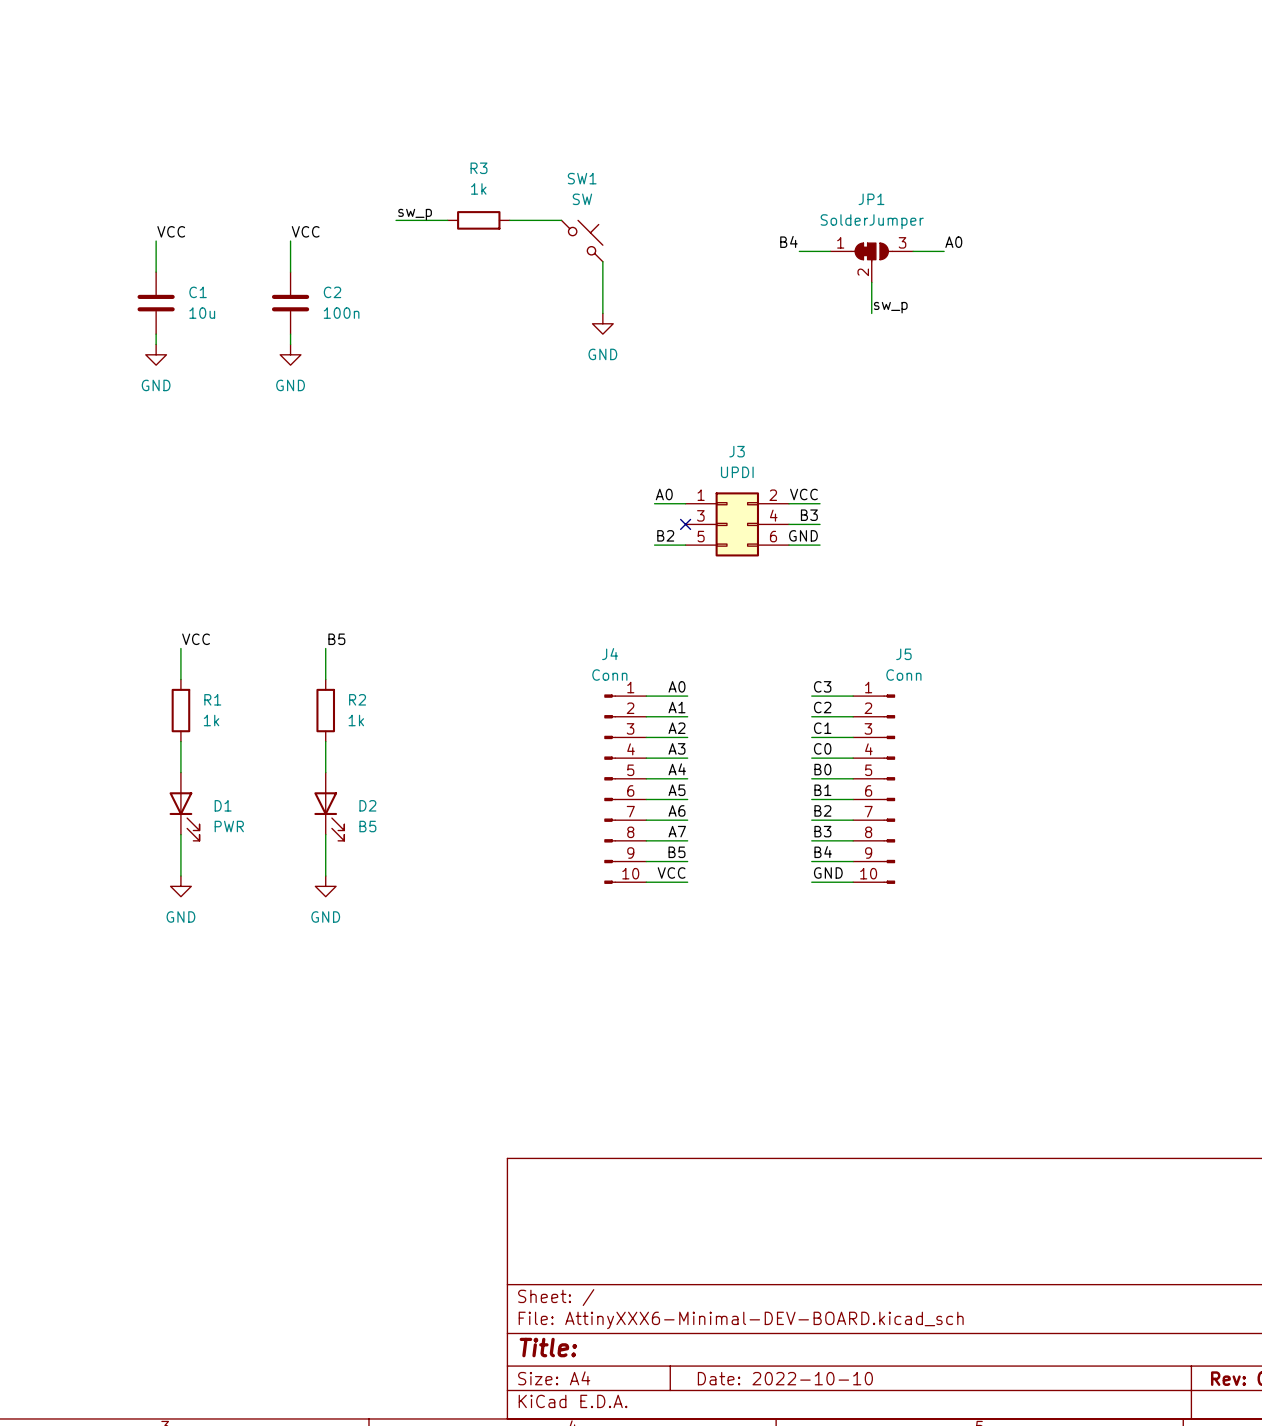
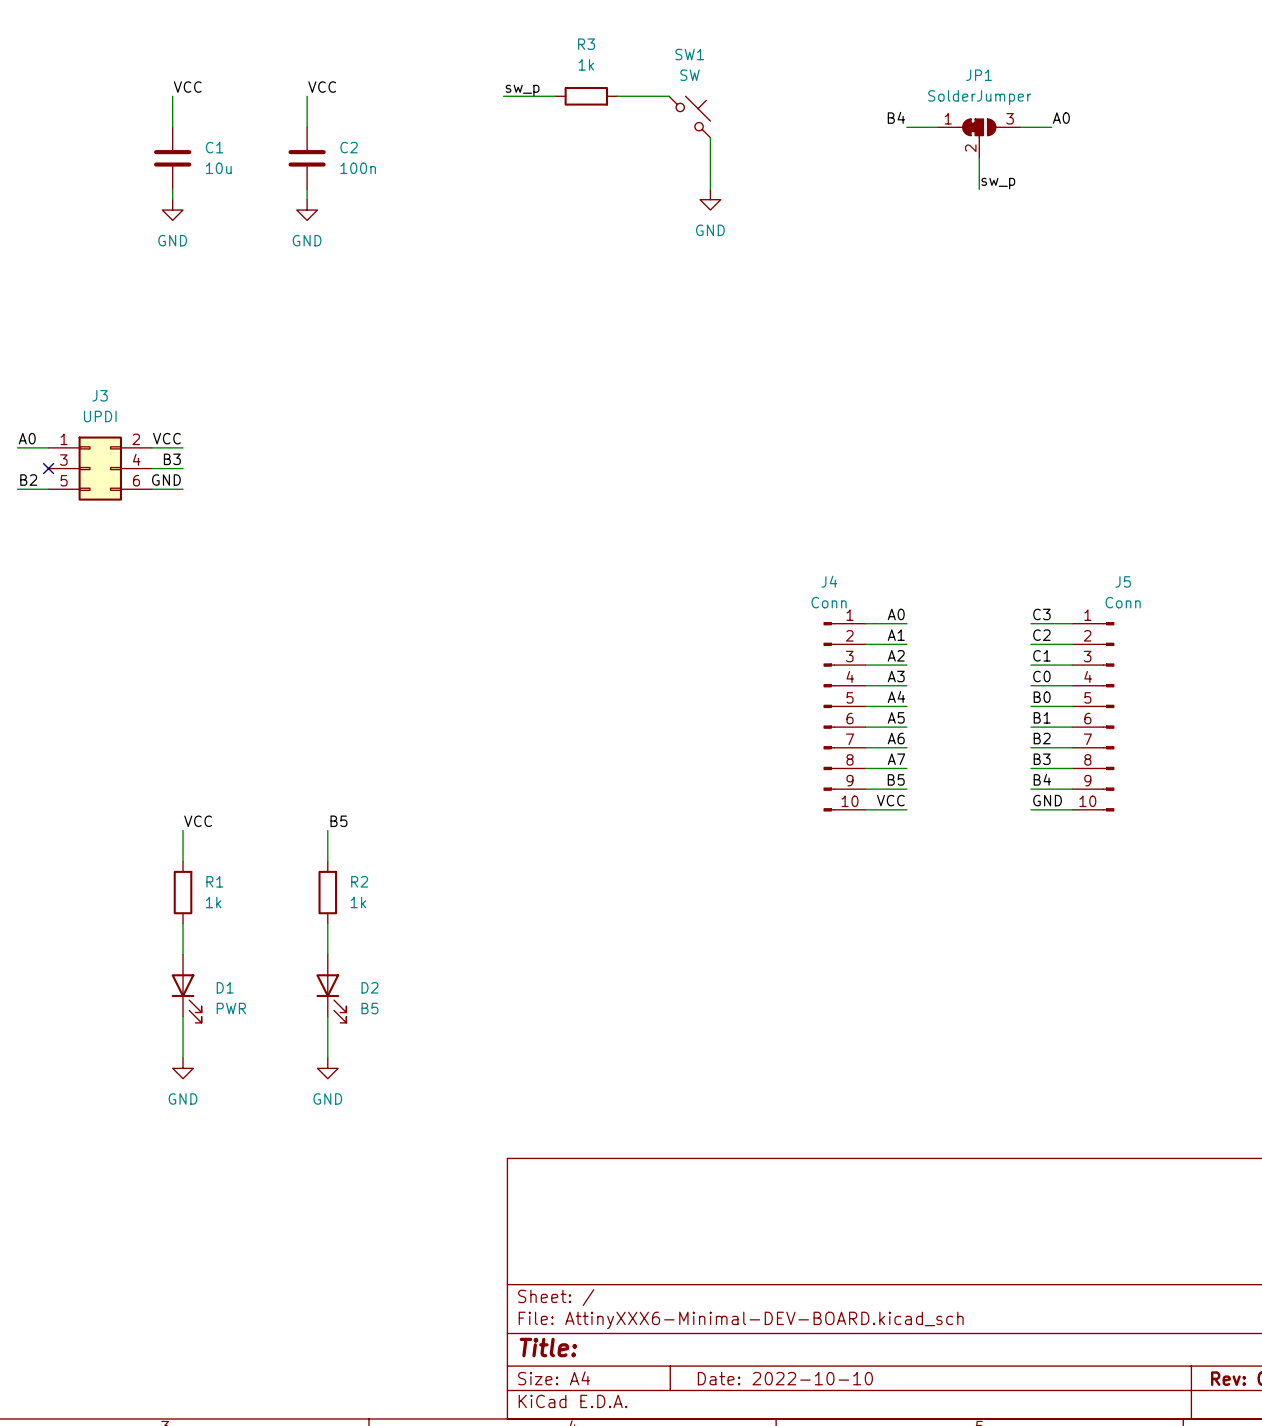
label: none -> VCC (187, 87)
label: none -> VCC (322, 87)
power symbol: none -> GND (710, 199)
power symbol: none -> GND (172, 210)
power symbol: none -> GND (307, 210)
label position: sw_p (415, 214) -> sw_p (522, 90)
wire: (396, 220) (447, 220) -> (503, 96) (555, 96)
R3 position: (478, 220) -> (586, 96)
wire: (509, 220) (561, 220) -> (617, 96) (669, 96)
label: VCC (171, 231) -> none
label: VCC (305, 231) -> none
wire: (156, 241) (156, 272) -> (172, 96) (172, 127)
wire: (290, 241) (290, 272) -> (307, 96) (307, 127)
SW1 position: (582, 241) -> (689, 116)
label position: B4 (788, 241) -> B4 (896, 117)
label position: A0 (953, 242) -> A0 (1061, 118)
wire: (799, 251) (830, 251) -> (906, 127) (937, 127)
wire: (913, 251) (944, 251) -> (1020, 127) (1051, 127)
wire: (602, 261) (602, 313) -> (710, 137) (710, 189)
JP1 position: (871, 262) -> (979, 138)
wire: (871, 282) (871, 313) -> (979, 158) (979, 189)
C1 position: (156, 303) -> (172, 158)
C2 position: (290, 303) -> (307, 158)
label position: sw_p (890, 307) -> sw_p (998, 183)
power symbol: GND (602, 323) -> none
wire: (156, 334) (156, 344) -> (172, 189) (172, 199)
wire: (290, 334) (290, 344) -> (307, 189) (307, 199)
power symbol: GND (156, 354) -> none
power symbol: GND (290, 354) -> none
label: none -> A0 (27, 438)
label: none -> VCC (166, 438)
wire: none -> (17, 447) (48, 447)
wire: none -> (151, 447) (183, 447)
label: none -> B3 (172, 459)
no-connect mark: none -> (48, 468)
wire: none -> (151, 468) (183, 468)
label: none -> B2 (28, 480)
label: none -> GND (166, 480)
wire: none -> (17, 489) (48, 489)
wire: none -> (151, 489) (183, 489)
label: A0 (664, 494) -> none
label: VCC (803, 494) -> none
wire: (654, 503) (685, 503) -> none
wire: (789, 503) (820, 503) -> none
label: B3 (809, 515) -> none
no-connect mark: (685, 524) -> none
J3 position: (737, 524) -> (100, 468)
wire: (789, 524) (820, 524) -> none
label: B2 (665, 535) -> none
label: GND (803, 535) -> none
wire: (654, 545) (685, 545) -> none
wire: (789, 545) (820, 545) -> none
label: none -> A0 (896, 614)
label: none -> C3 (1041, 614)
wire: none -> (1030, 623) (1072, 623)
label: none -> A1 (896, 635)
label: none -> C2 (1041, 635)
label: VCC (196, 639) -> none
label: B5 (336, 639) -> none
wire: none -> (1030, 644) (1072, 644)
wire: (180, 648) (180, 679) -> (183, 830) (183, 861)
wire: (325, 648) (325, 679) -> (327, 830) (327, 861)
label: none -> A2 (896, 655)
label: none -> C1 (1041, 655)
wire: none -> (1030, 665) (1072, 665)
label: none -> A3 (896, 676)
label: none -> C0 (1041, 676)
wire: none -> (1030, 685) (1072, 685)
label: A0 (676, 686) -> none
label: C3 (822, 686) -> none
wire: (646, 696) (687, 696) -> none
wire: (811, 696) (853, 696) -> (865, 623) (906, 623)
label: none -> A4 (896, 696)
label: none -> B0 (1042, 697)
wire: none -> (1030, 706) (1072, 706)
label: A1 (676, 707) -> none
label: C2 (822, 707) -> none
R1 position: (180, 710) -> (183, 892)
R2 position: (325, 710) -> (327, 892)
wire: (646, 716) (687, 716) -> none
wire: (811, 716) (853, 716) -> (865, 644) (906, 644)
label: none -> A5 (896, 717)
label: none -> B1 (1042, 717)
wire: none -> (1030, 727) (1072, 727)
label: A2 (676, 728) -> none
label: C1 (822, 728) -> none
wire: (646, 737) (687, 737) -> none
wire: (811, 737) (853, 737) -> (865, 665) (906, 665)
label: none -> A6 (896, 738)
label: none -> B2 (1042, 738)
wire: (180, 741) (180, 772) -> (183, 923) (183, 954)
wire: (325, 741) (325, 772) -> (327, 923) (327, 954)
wire: none -> (1030, 747) (1072, 747)
label: A3 (676, 748) -> none
label: C0 (822, 748) -> none
wire: (646, 758) (687, 758) -> none
wire: (811, 758) (853, 758) -> (865, 685) (906, 685)
label: none -> A7 (896, 759)
label: none -> B3 (1042, 759)
wire: none -> (1030, 768) (1072, 768)
label: A4 (677, 769) -> none
label: B0 (822, 769) -> none
wire: (646, 778) (687, 778) -> none
wire: (811, 778) (853, 778) -> (865, 706) (906, 706)
label: none -> B5 (896, 779)
label: none -> B4 (1042, 779)
J4 position: (625, 789) -> (844, 716)
J5 position: (874, 789) -> (1093, 716)
wire: none -> (1030, 789) (1072, 789)
label: A5 (676, 790) -> none
label: B1 (822, 790) -> none
wire: (646, 799) (687, 799) -> none
wire: (811, 799) (853, 799) -> (865, 727) (906, 727)
label: none -> VCC (890, 800)
label: none -> GND (1047, 800)
D1 position: (184, 806) -> (186, 988)
D2 position: (329, 806) -> (331, 988)
wire: none -> (1030, 809) (1072, 809)
label: A6 (676, 810) -> none
label: B2 (822, 810) -> none
wire: (646, 820) (687, 820) -> none
wire: (811, 820) (853, 820) -> (865, 747) (906, 747)
label: none -> VCC (198, 821)
label: none -> B5 (338, 821)
label: A7 (677, 831) -> none
label: B3 (822, 831) -> none
wire: (180, 834) (180, 876) -> (183, 1016) (183, 1058)
wire: (325, 834) (325, 876) -> (327, 1016) (327, 1058)
wire: (646, 840) (687, 840) -> none
wire: (811, 840) (853, 840) -> (865, 768) (906, 768)
label: B5 (676, 852) -> none
label: B4 (823, 852) -> none
wire: (646, 861) (687, 861) -> none
wire: (811, 861) (853, 861) -> (865, 789) (906, 789)
label: VCC (671, 872) -> none
label: GND (828, 872) -> none
wire: (646, 882) (687, 882) -> none
wire: (811, 882) (853, 882) -> (865, 809) (906, 809)
power symbol: GND (180, 886) -> none
power symbol: GND (325, 886) -> none
power symbol: none -> GND (183, 1068)
power symbol: none -> GND (327, 1068)

